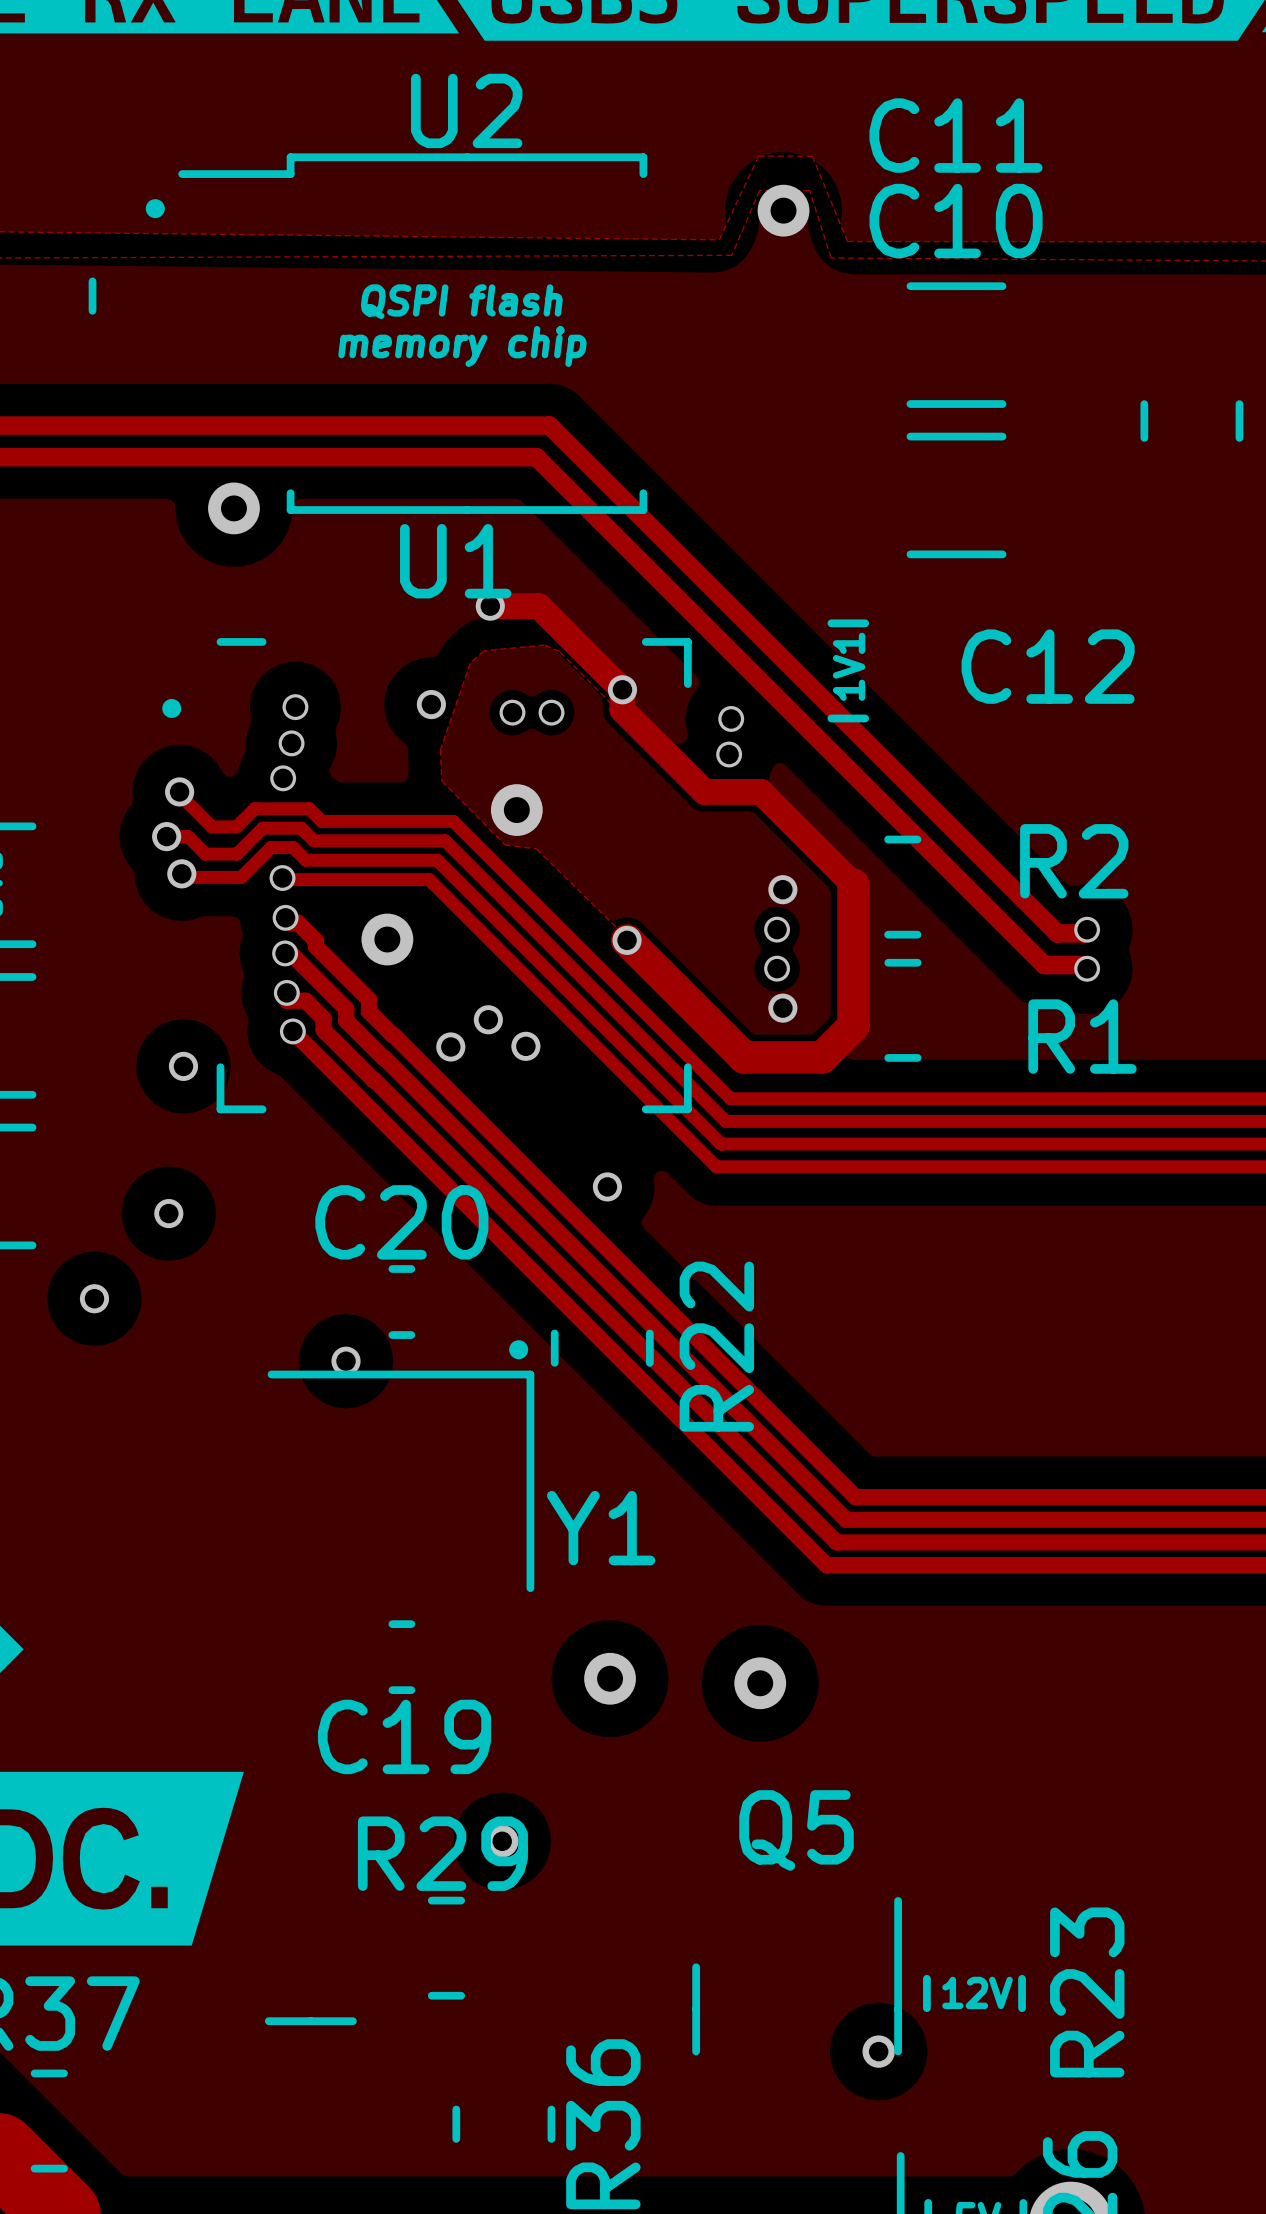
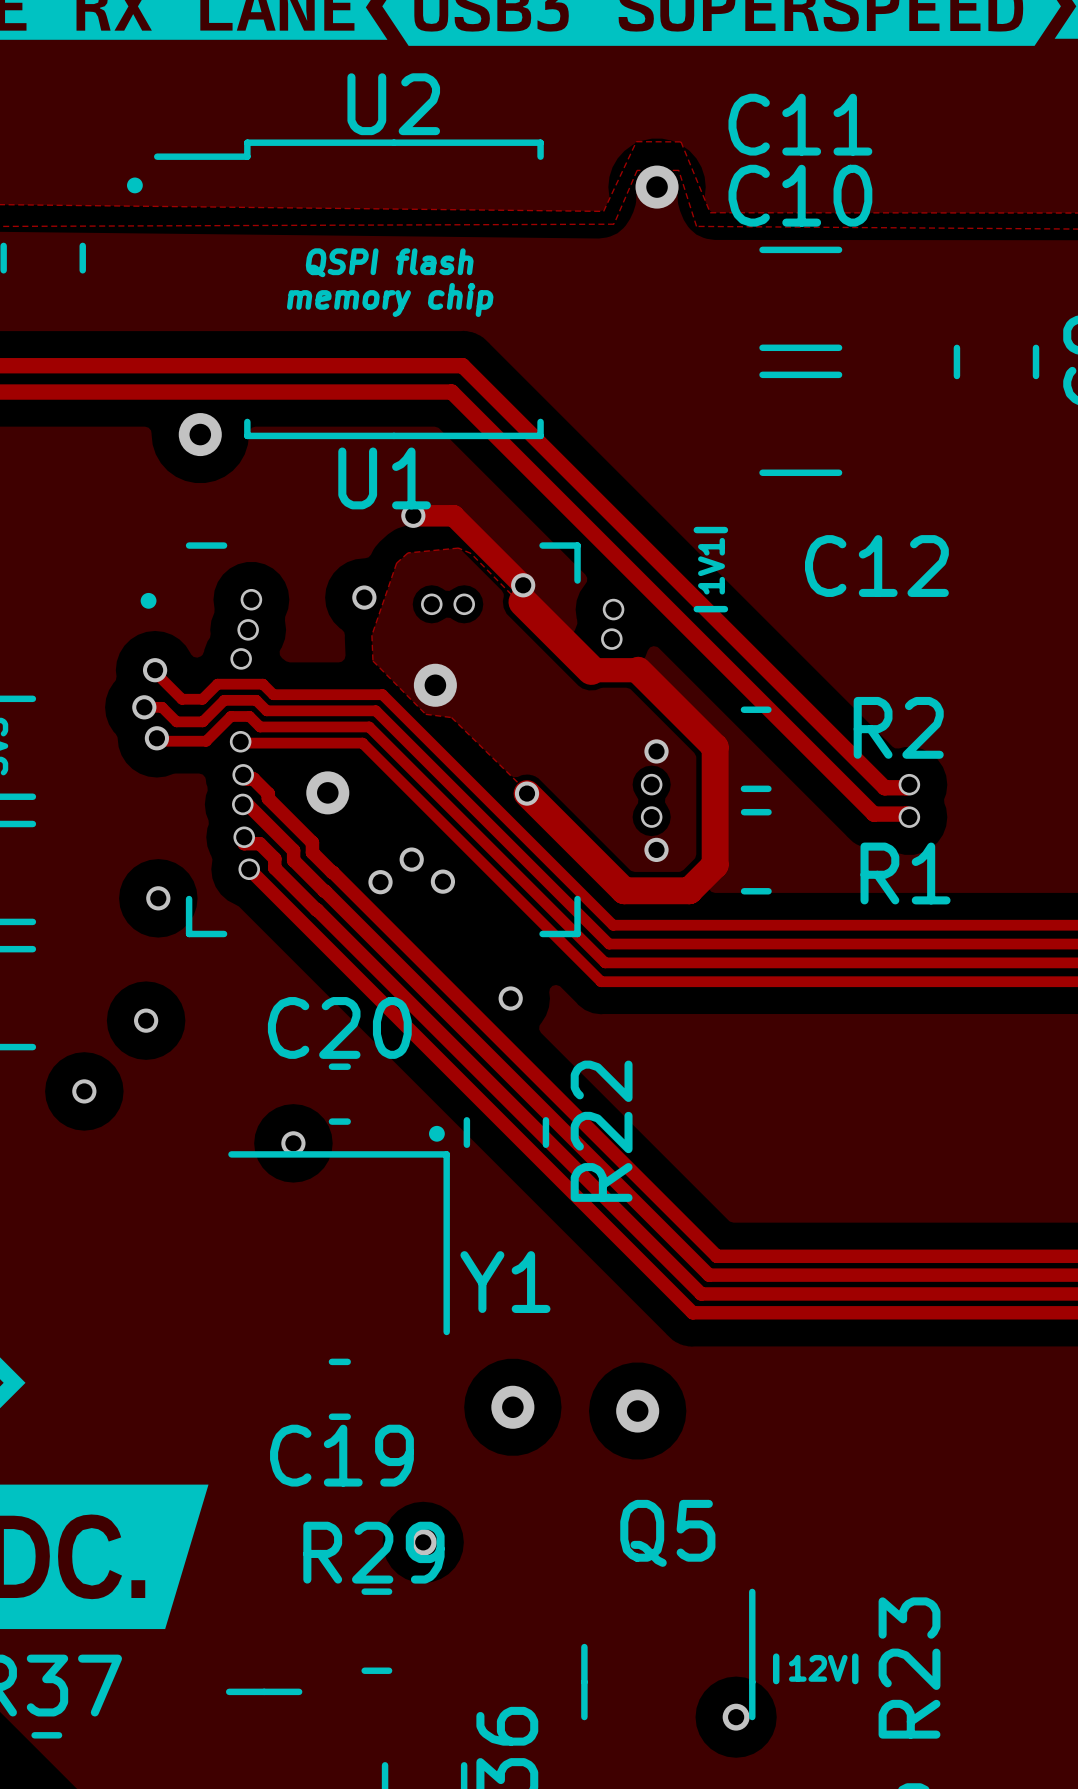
track width: thin (622, 709) (704, 791) (760, 791) (853, 884) -> thick (523, 601) (591, 670) (638, 670) (715, 747)

